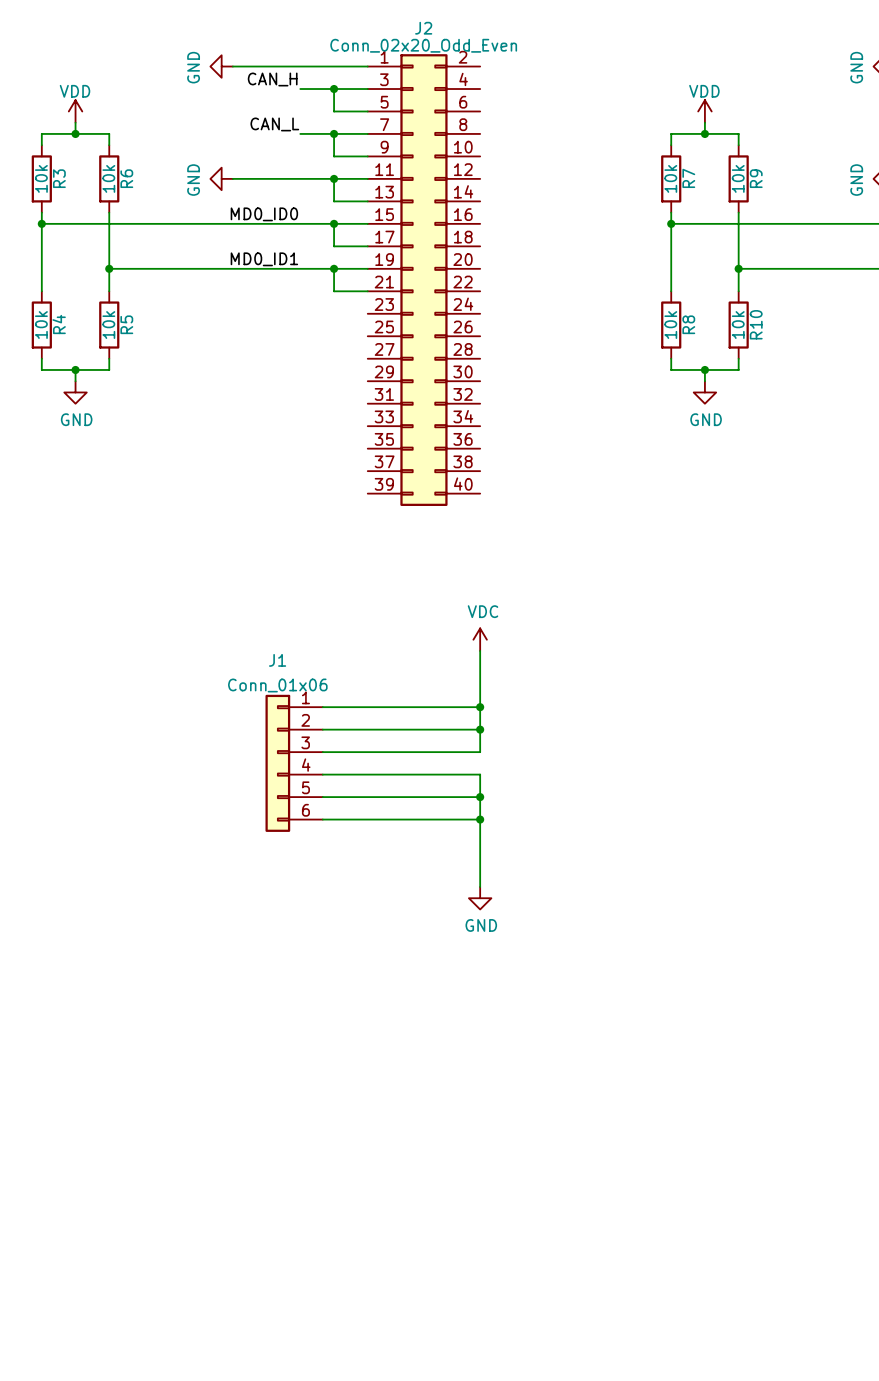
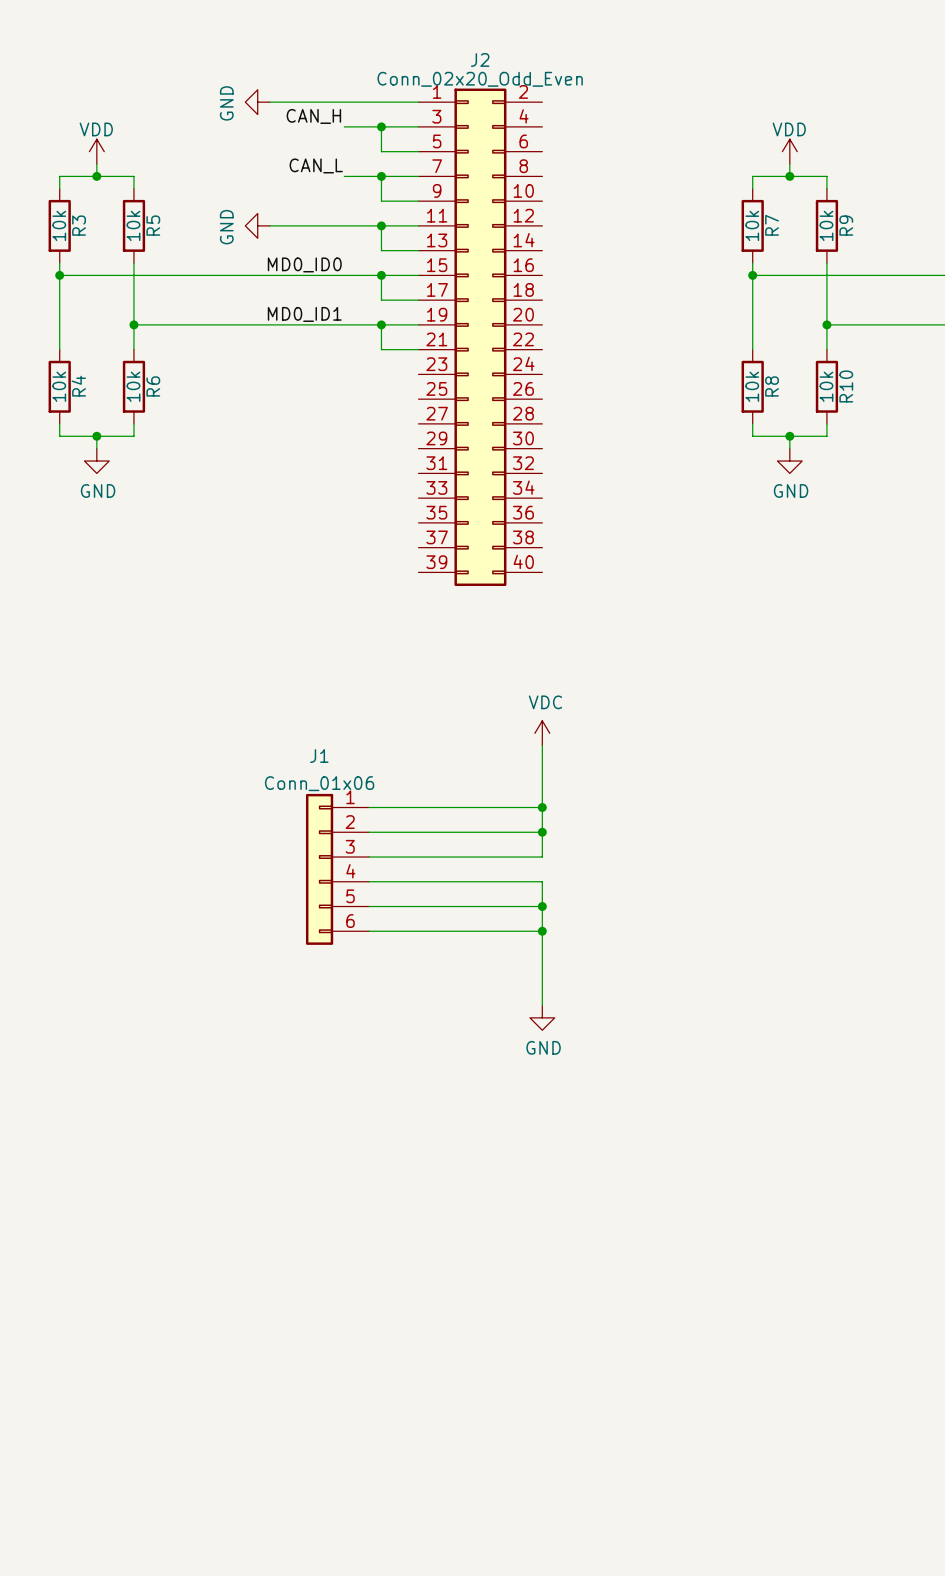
R6 name: R6 (126, 178) -> R5 (153, 225)
R5 name: R5 (126, 324) -> R6 (153, 386)

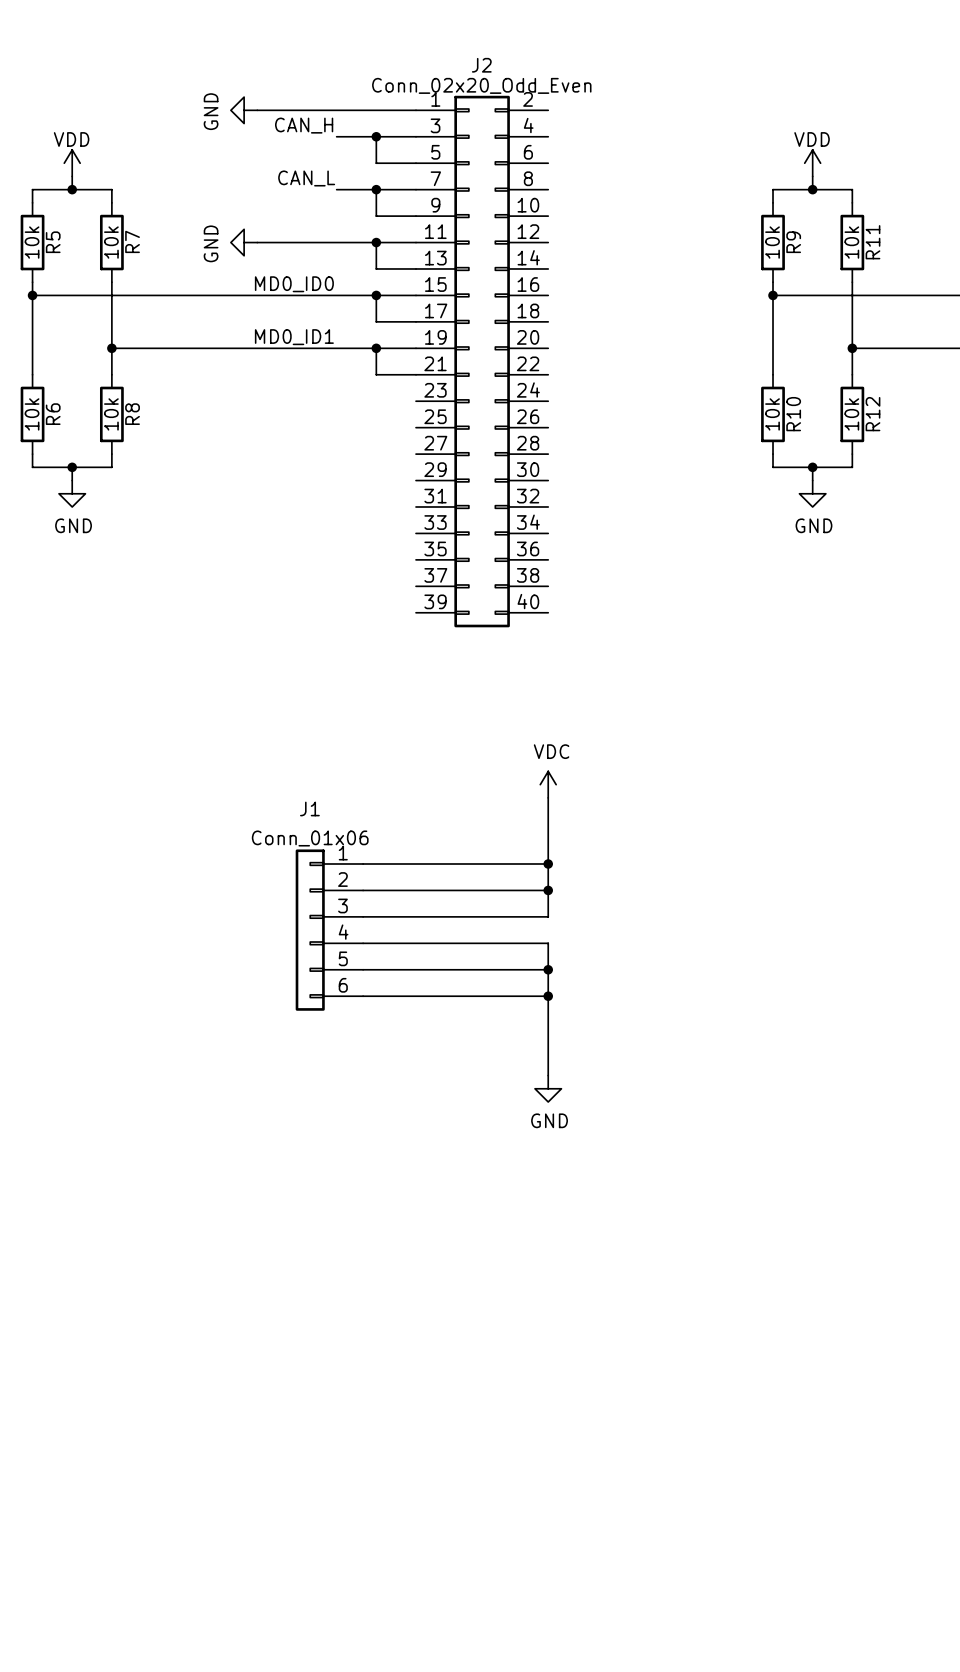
R3 name: R3 (79, 225) -> R5 (53, 242)
R5 name: R5 (153, 225) -> R7 (132, 241)
R7 name: R7 (772, 225) -> R9 (793, 242)
R9 name: R9 (846, 225) -> R11 (873, 242)
R4 name: R4 (78, 386) -> R6 (53, 414)
R6 name: R6 (153, 386) -> R8 (132, 414)
R8 name: R8 (772, 386) -> R10 (793, 414)
R10 name: R10 (846, 386) -> R12 (873, 414)

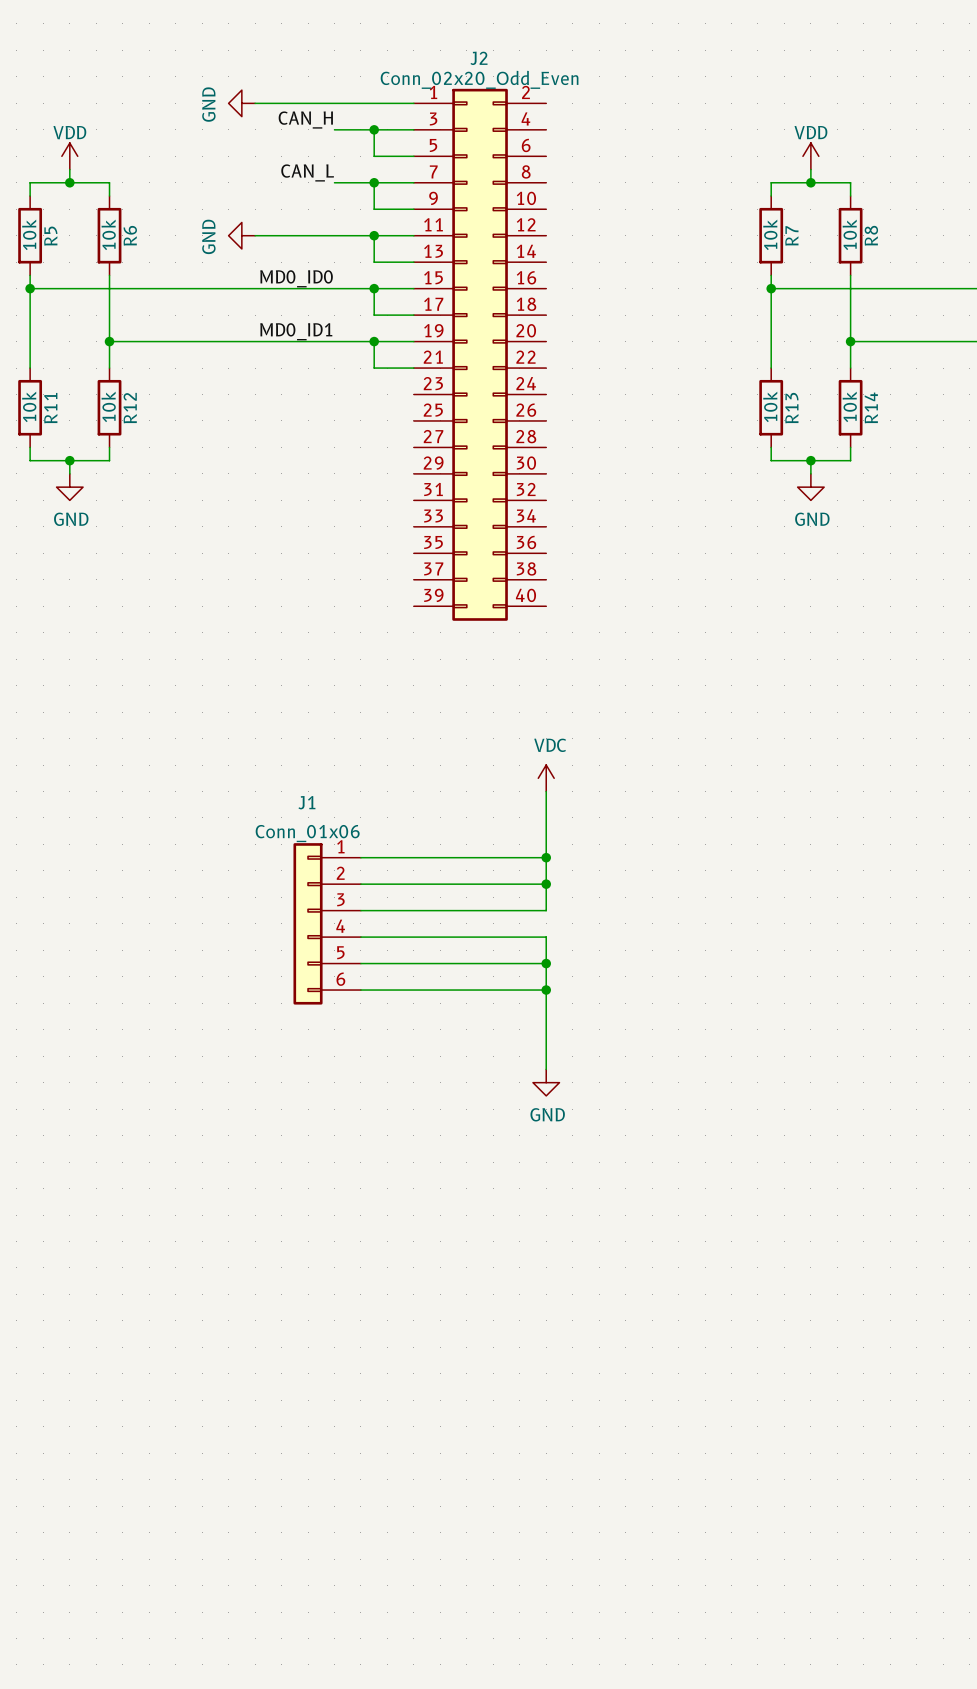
R7 name: R7 (132, 241) -> R6 (130, 235)
R9 name: R9 (793, 242) -> R7 (791, 235)
R11 name: R11 (873, 242) -> R8 (871, 235)
R6 name: R6 (53, 414) -> R11 (50, 408)
R8 name: R8 (132, 414) -> R12 (130, 408)
R10 name: R10 (793, 414) -> R13 (791, 408)
R12 name: R12 (873, 414) -> R14 (871, 407)

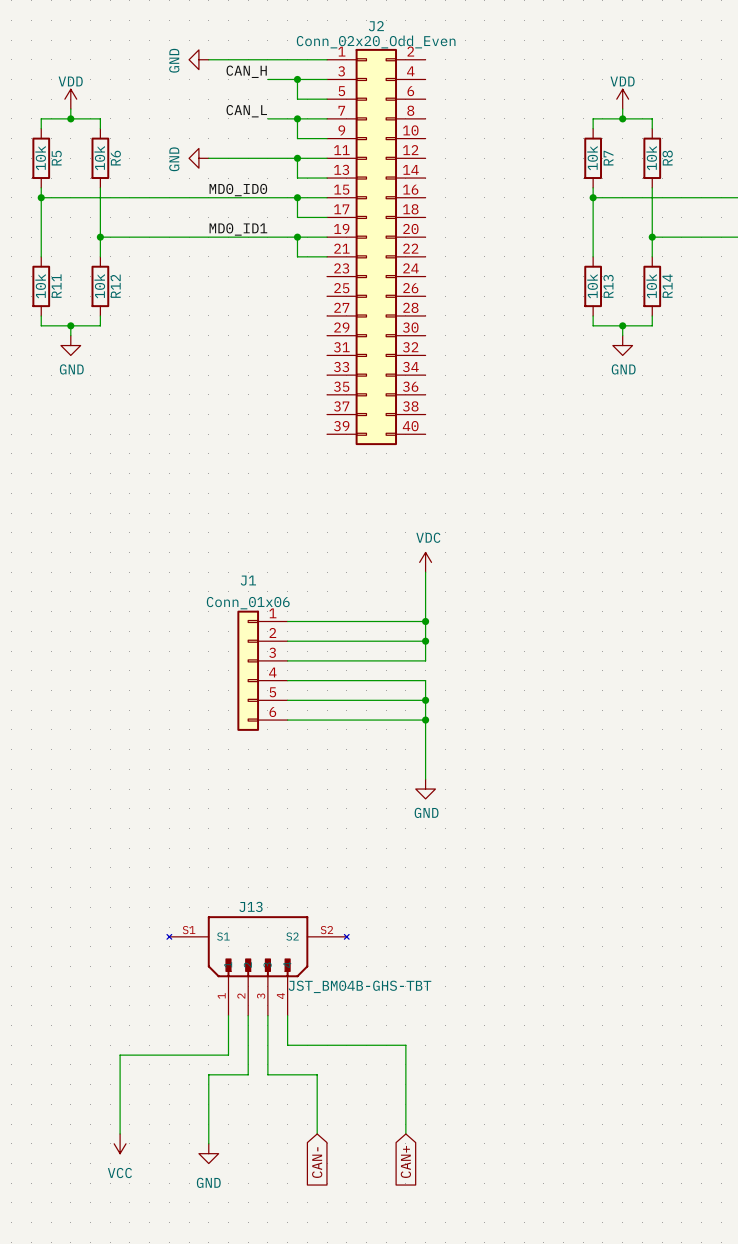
J13: none -> JST_BM04B-GHS-TBT (258, 965)
wire: none -> (228, 1015) (228, 1055) (120, 1055) (120, 1133)
wire: none -> (248, 1015) (248, 1074) (208, 1074) (208, 1143)
wire: none -> (267, 1015) (267, 1074) (317, 1074) (317, 1133)
wire: none -> (287, 1015) (287, 1045) (405, 1045) (405, 1133)
power symbol: none -> VCC (120, 1143)
power symbol: none -> GND (208, 1153)
global label: none -> CAN- (317, 1162)
global label: none -> CAN+ (405, 1161)

